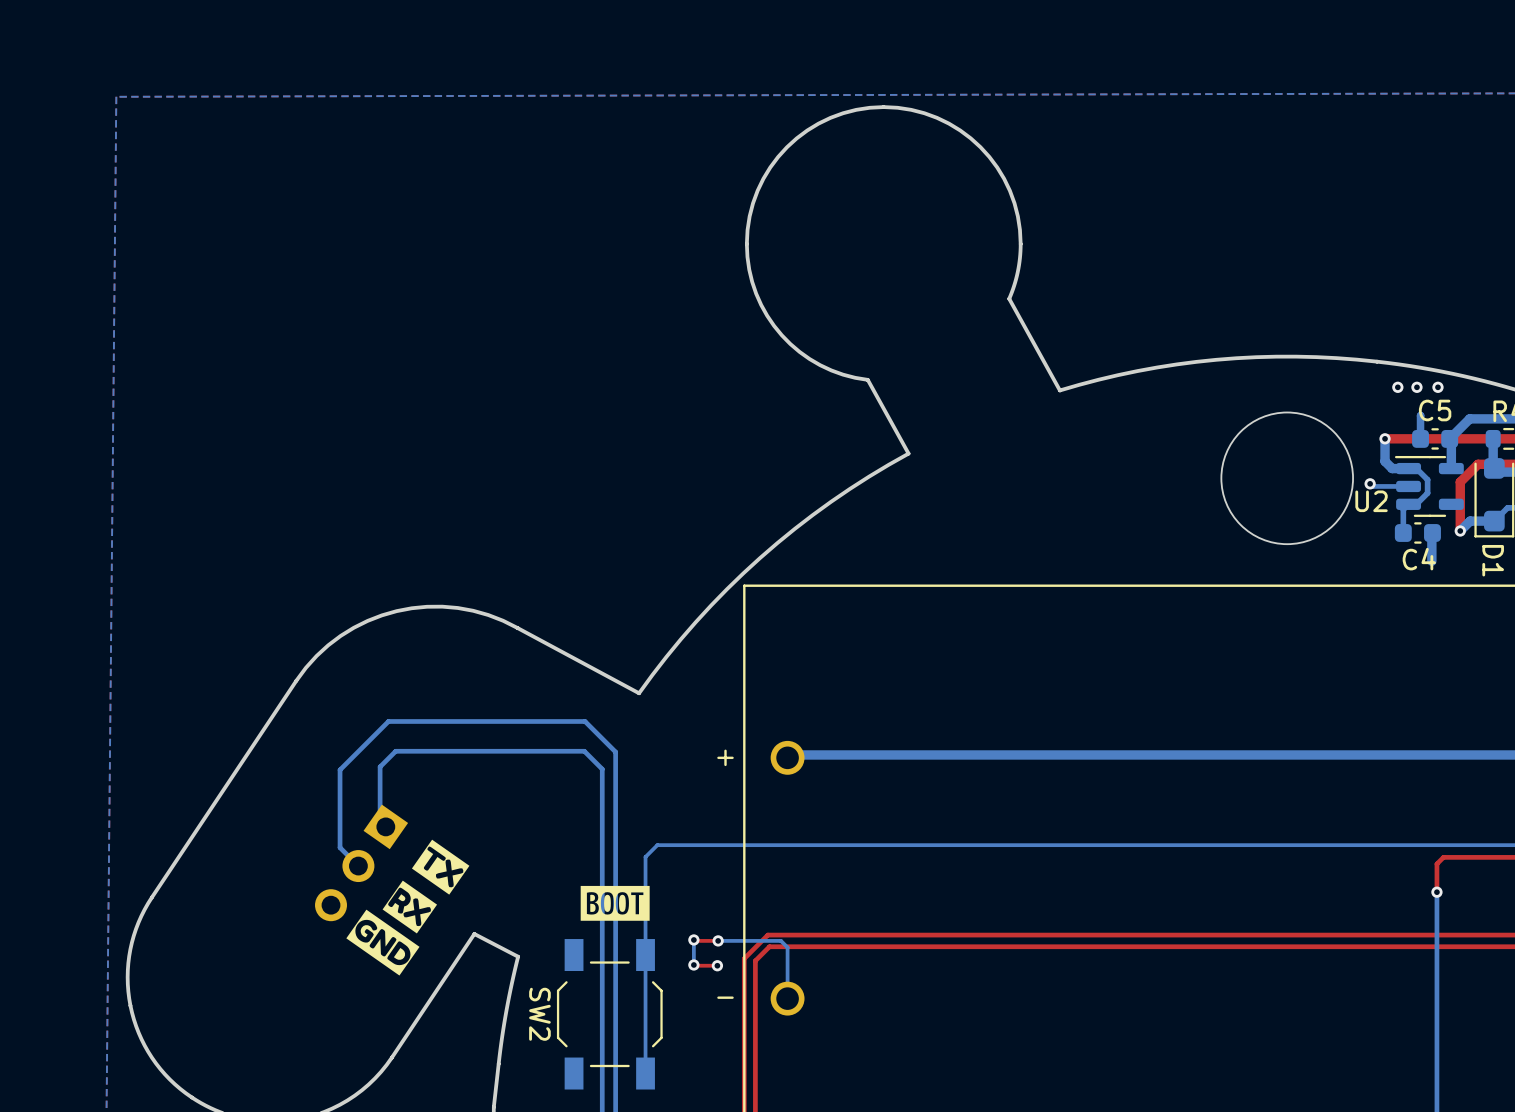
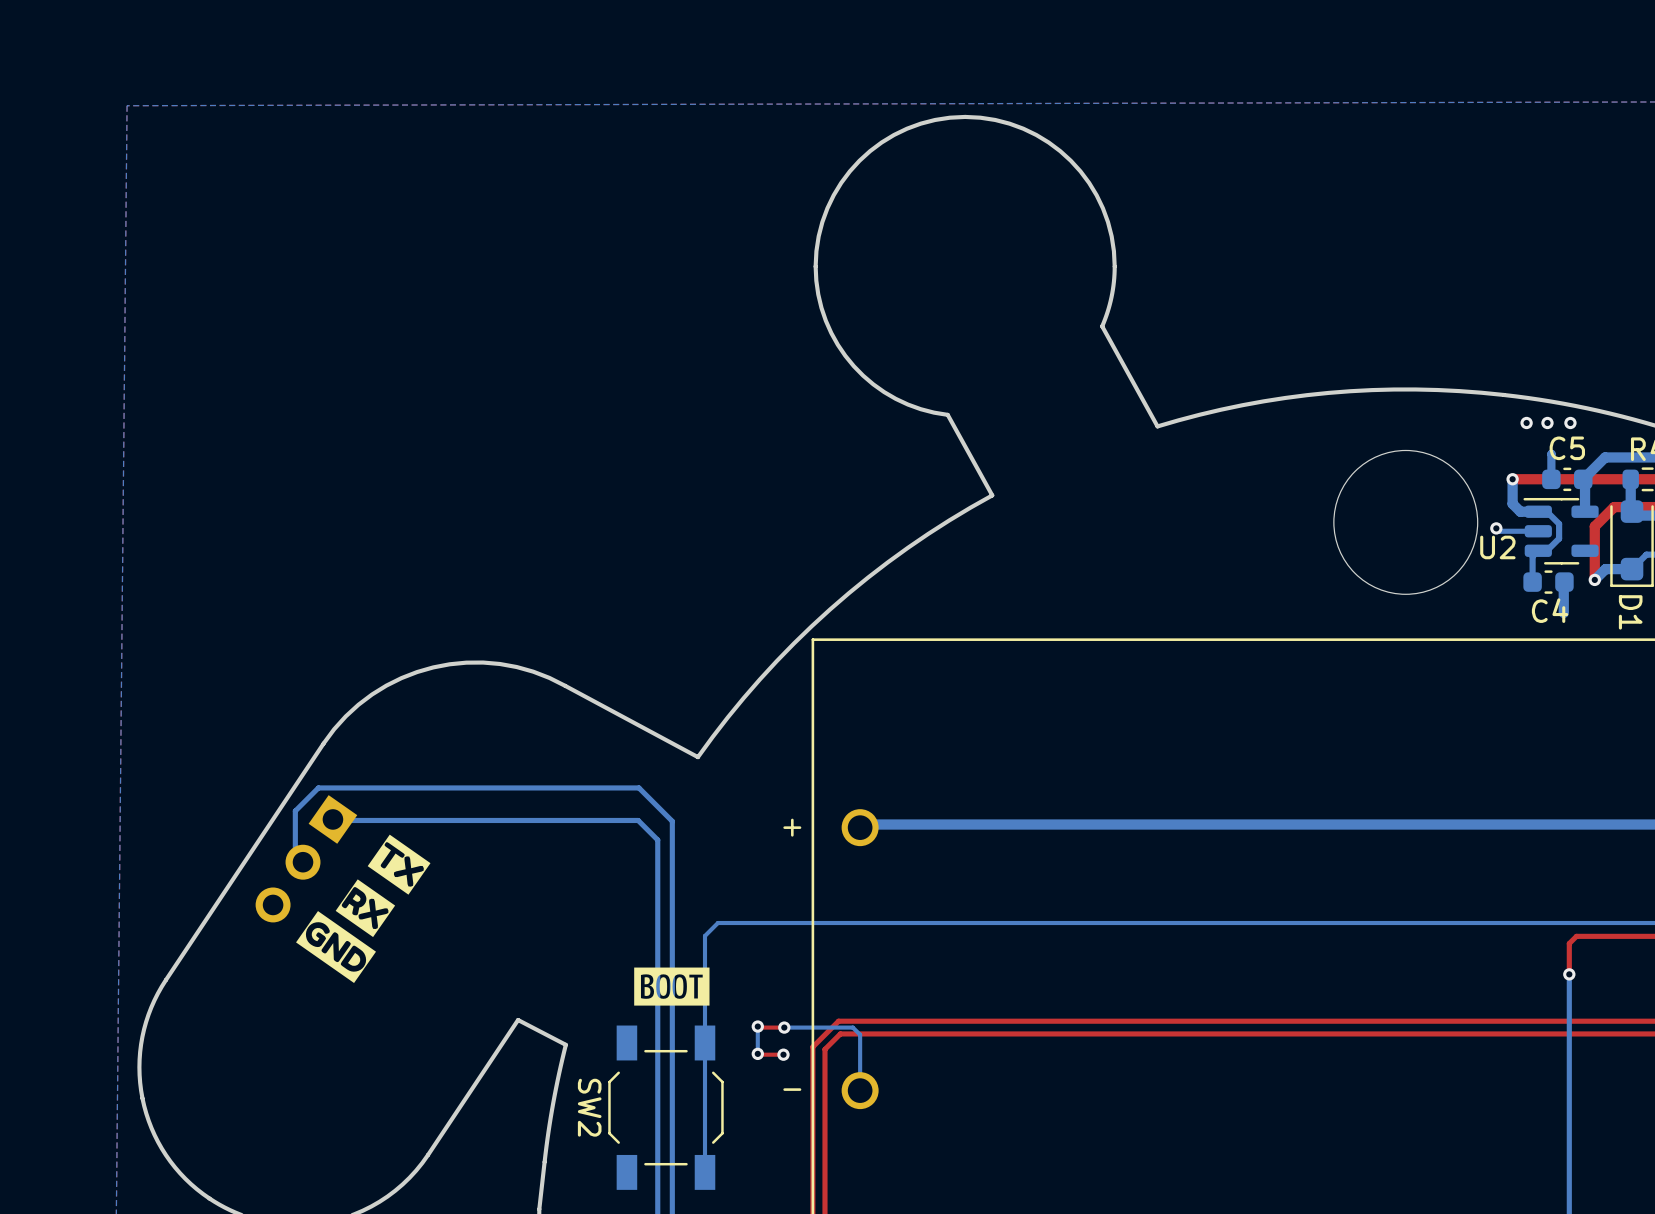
bottom track: (388, 721) (340, 769) (340, 847) (358, 866) -> (424, 787) (318, 787) (295, 811) (295, 854) (303, 863)
bottom track: (395, 751) (380, 766) (380, 821) (385, 826) -> (432, 820) (333, 820)
part position: (361, 862) -> (306, 858)
drawing position: (440, 867) -> (399, 864)
drawing position: (409, 907) -> (365, 908)
drawing position: (382, 942) -> (336, 947)

